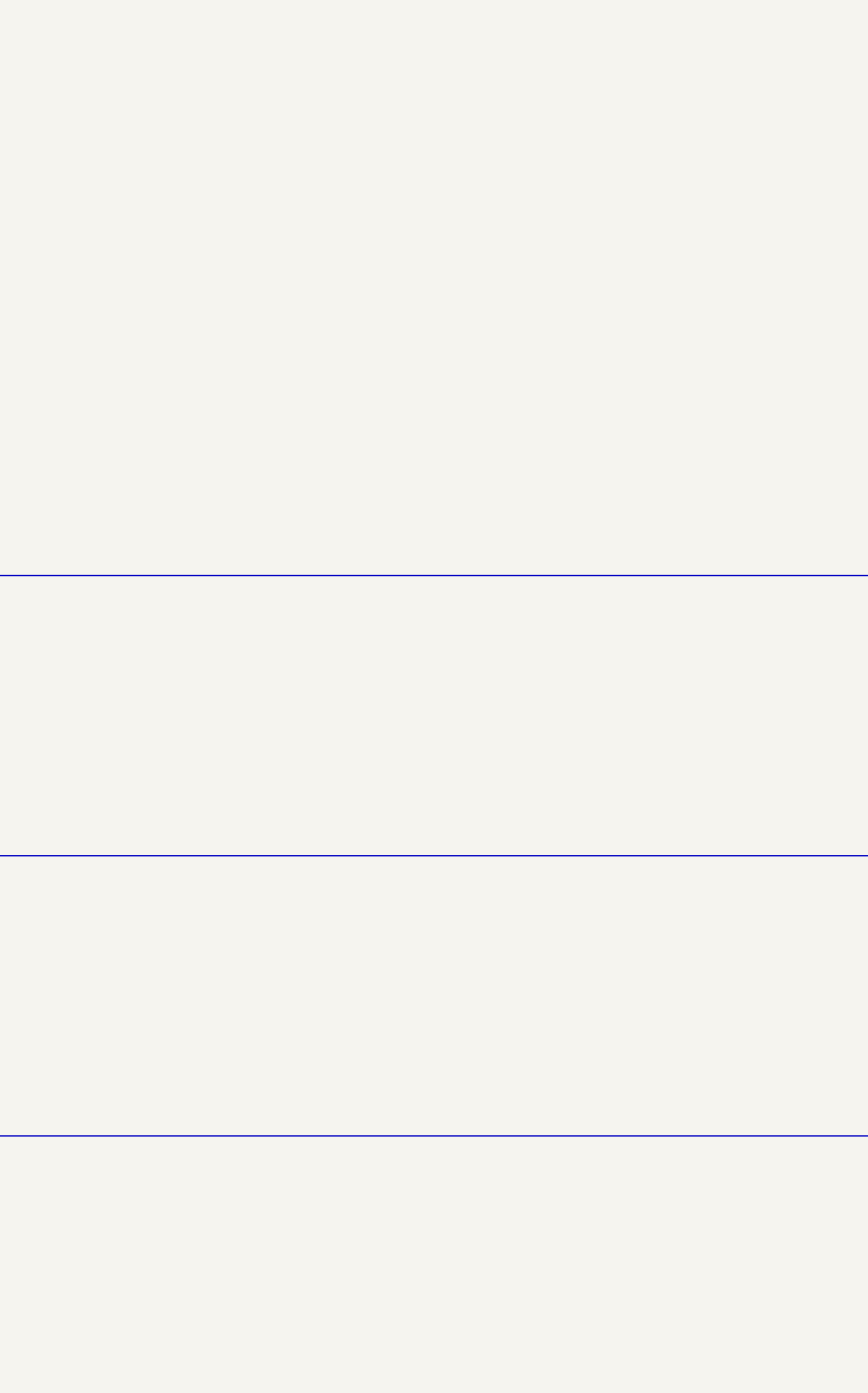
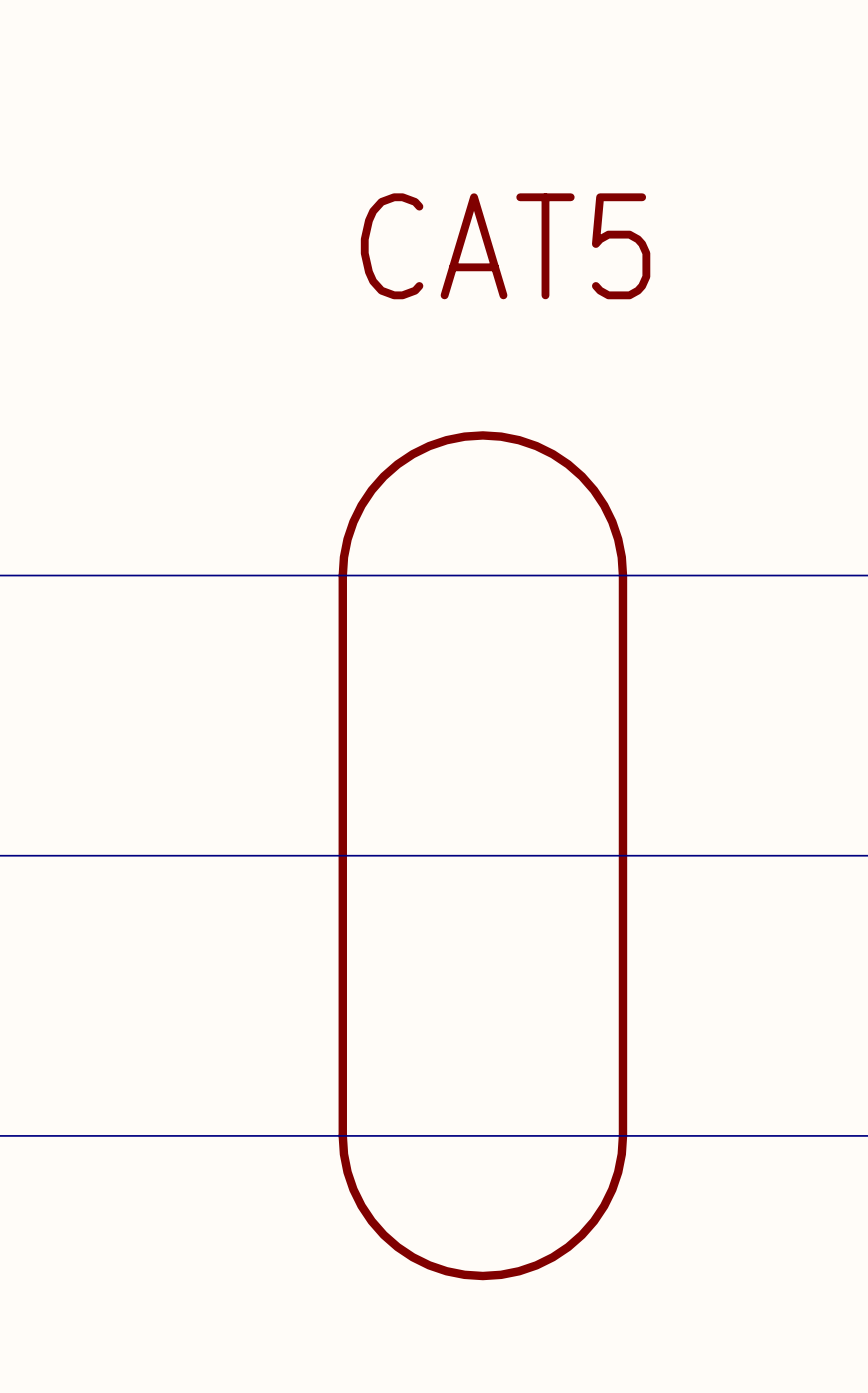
text: none -> CAT5 (505, 246)
line: none -> (342, 575) (342, 1135) (347, 1172) (353, 1189) (371, 1221) (383, 1234) (412, 1257) (446, 1271) (464, 1274) (501, 1274) (519, 1271) (552, 1257) (581, 1234) (594, 1221) (612, 1189) (621, 1154) (622, 575) (618, 539) (612, 521) (594, 490) (568, 464) (536, 446) (519, 440) (501, 436) (464, 436) (429, 446) (397, 464) (383, 476) (371, 490) (353, 521) (347, 539) (342, 575)

